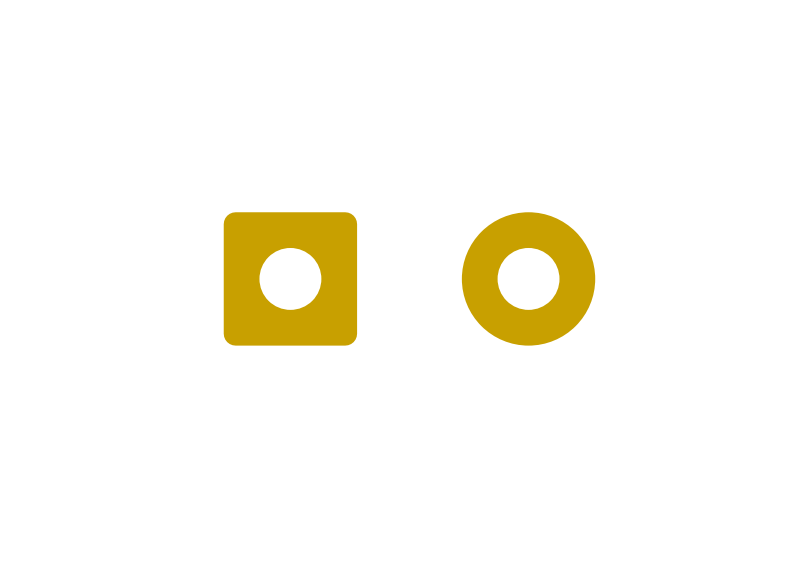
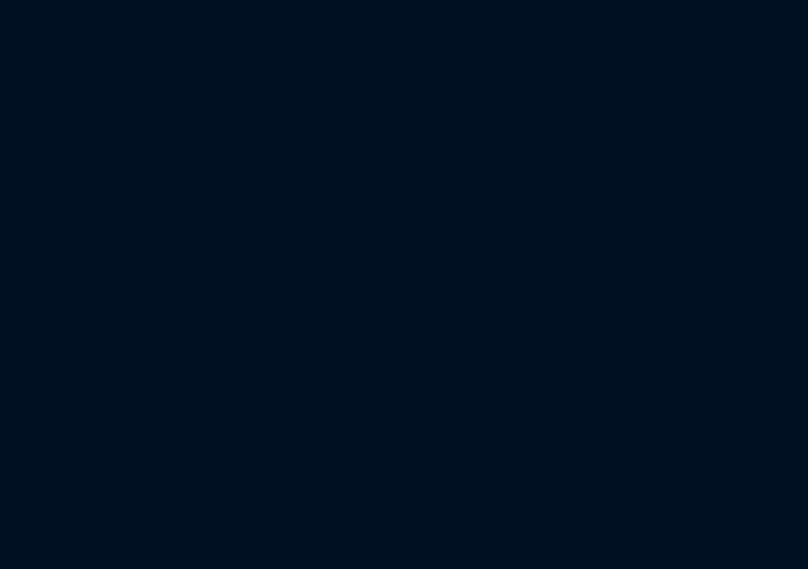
part: (409, 278) -> none

